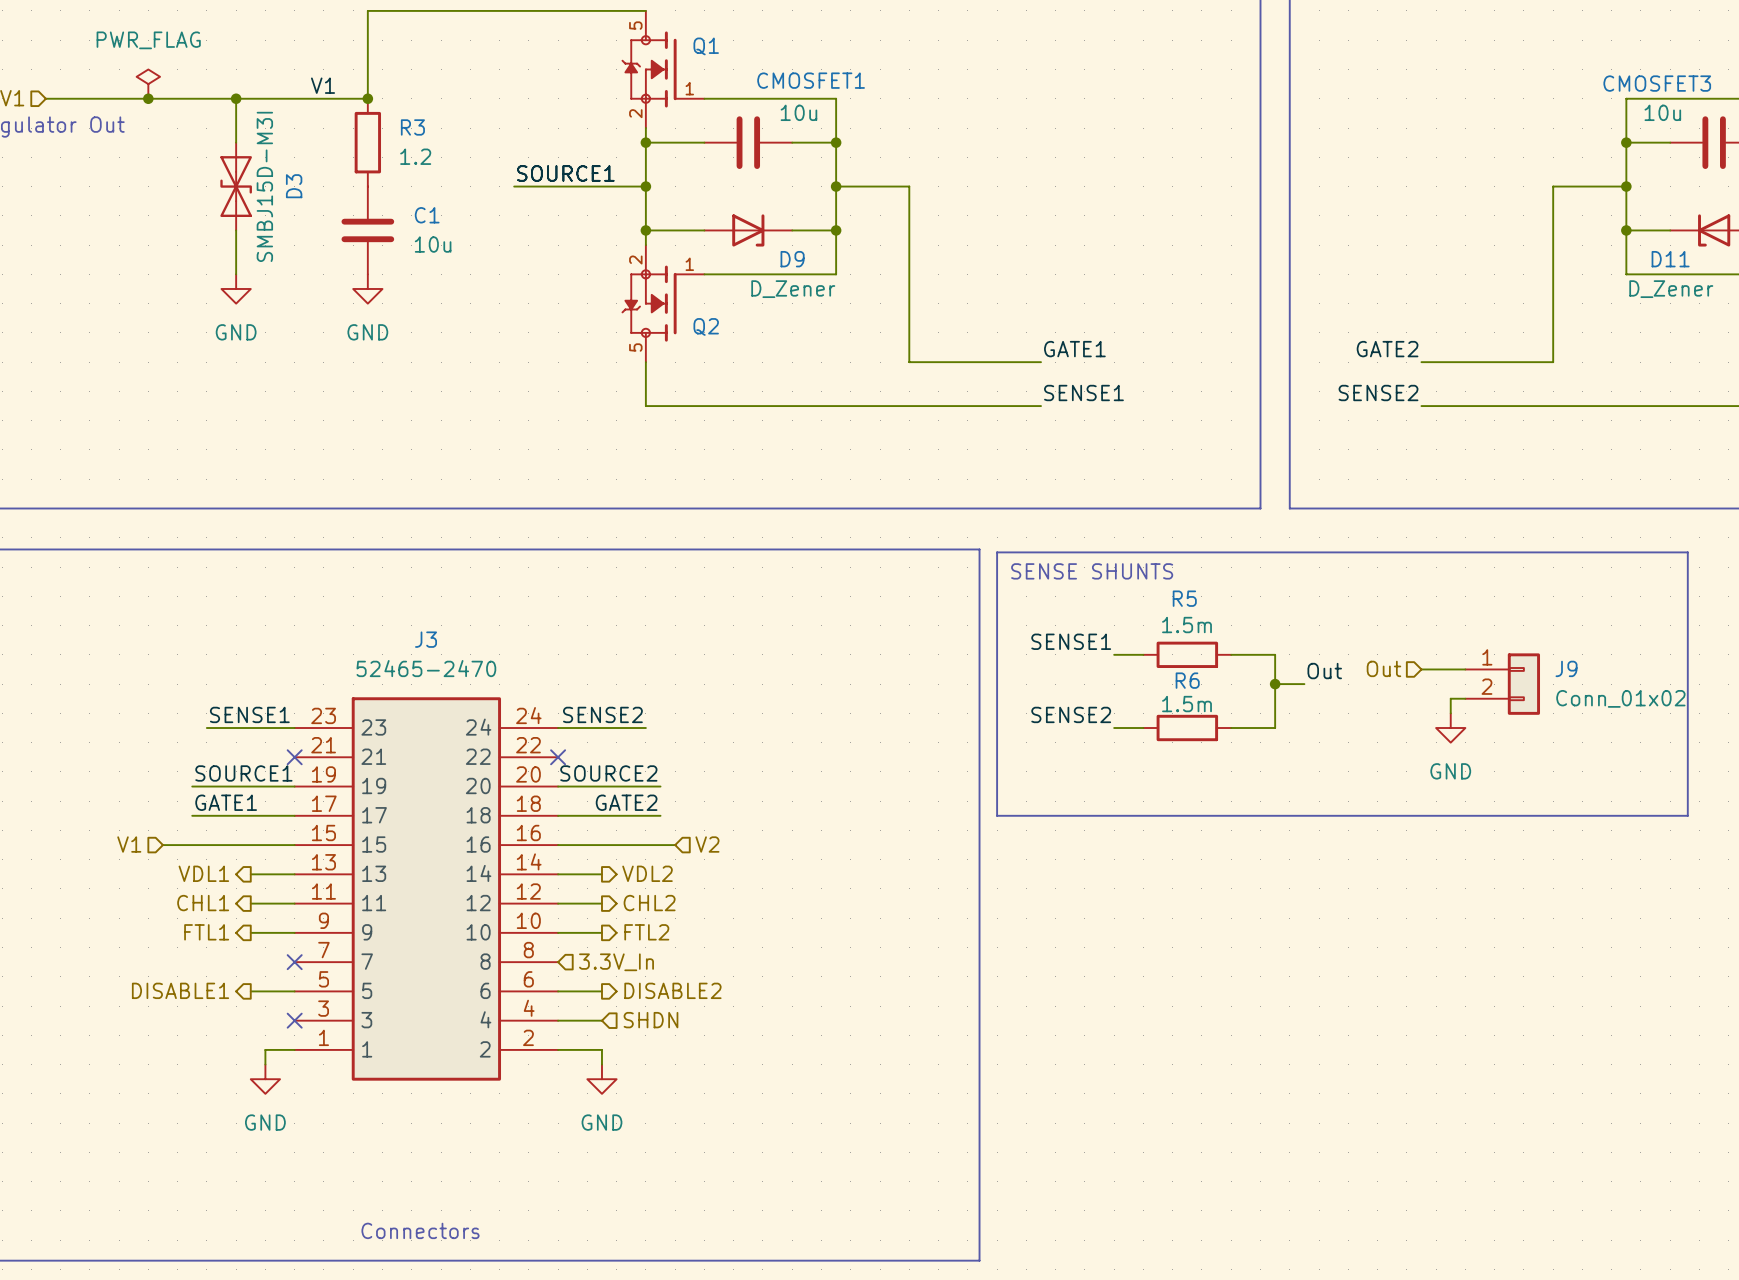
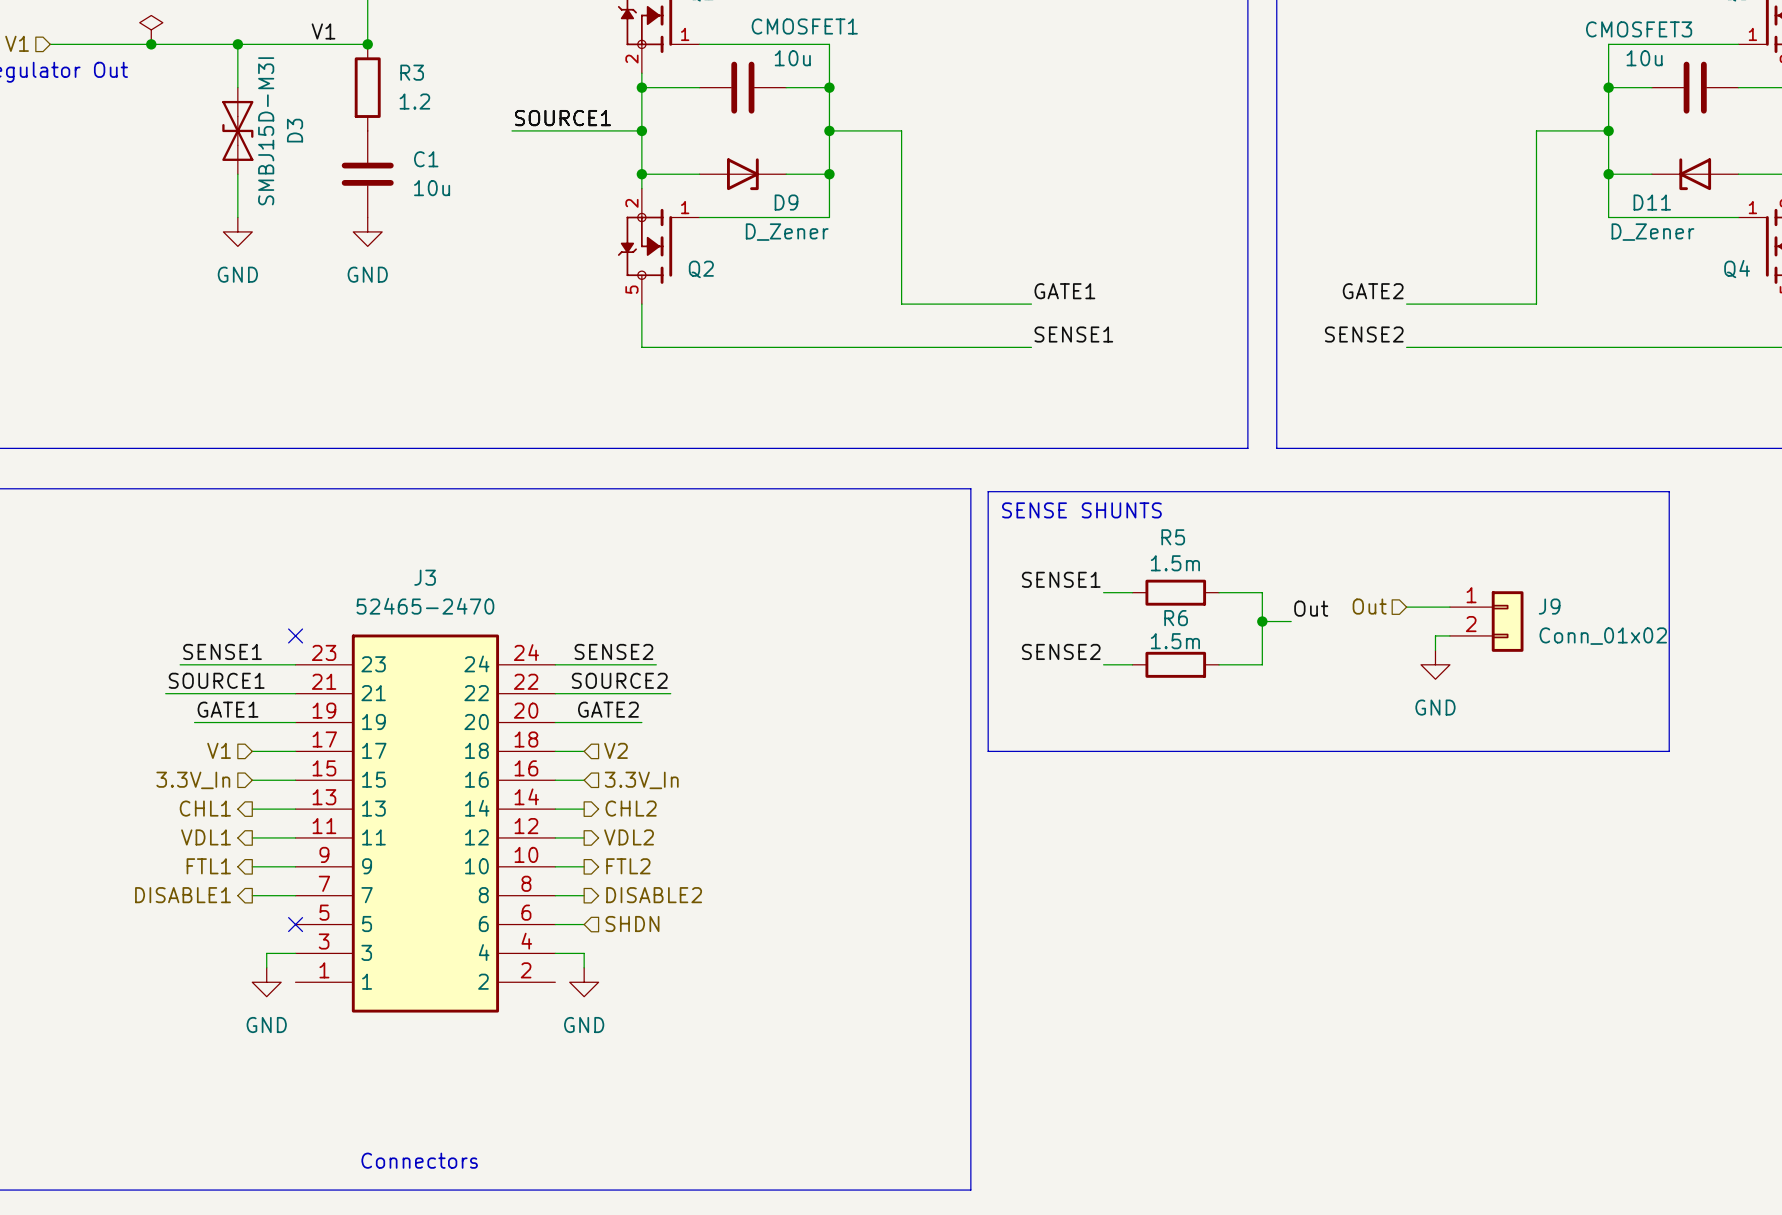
label position: SENSE1 (249, 714) -> SENSE1 (222, 651)
label position: SENSE2 (602, 714) -> SENSE2 (613, 651)
wire: none -> (180, 664) (208, 664)
label: none -> SOURCE1 (216, 680)
wire: none -> (165, 693) (295, 693)
no-connect mark position: (294, 757) -> (295, 635)
wire: none -> (555, 693) (670, 693)
no-connect mark: (558, 757) -> none
label: SOURCE1 (243, 773) -> GATE1 (228, 709)
label position: SOURCE2 (608, 773) -> SOURCE2 (619, 680)
wire: (645, 786) (660, 786) -> (641, 664) (656, 664)
label: GATE1 (226, 802) -> none
label position: GATE2 (626, 802) -> GATE2 (608, 709)
wire: (192, 815) (250, 815) -> none
wire: (587, 815) (660, 815) -> none
hierarchical label position: V1 (129, 844) -> V1 (219, 750)
hierarchical label position: V2 (707, 844) -> V2 (615, 750)
wire: (162, 845) (250, 845) -> none
hierarchical label: none -> 3.3V_In (193, 780)
wire: (587, 845) (675, 845) -> none
hierarchical label: VDL1 (203, 873) -> CHL1 (205, 808)
hierarchical label position: VDL2 (647, 873) -> VDL2 (629, 837)
wire: (587, 874) (601, 874) -> none
hierarchical label: CHL1 (203, 903) -> VDL1 (206, 837)
wire: (587, 903) (601, 903) -> none
hierarchical label position: CHL2 (649, 903) -> CHL2 (631, 808)
wire: (587, 932) (601, 932) -> none
hierarchical label position: FTL2 (646, 932) -> FTL2 (628, 866)
no-connect mark: (294, 962) -> none
wire: none -> (555, 895) (584, 895)
hierarchical label position: 3.3V_In (616, 962) -> 3.3V_In (641, 780)
hierarchical label position: DISABLE1 (180, 990) -> DISABLE1 (183, 895)
hierarchical label position: DISABLE2 (672, 990) -> DISABLE2 (654, 895)
wire: (250, 991) (294, 991) -> (252, 895) (295, 895)
no-connect mark: none -> (295, 924)
wire: (587, 991) (601, 991) -> none
no-connect mark: (294, 1020) -> none
wire: (587, 1020) (601, 1020) -> (584, 953) (584, 967)
hierarchical label position: SHDN (650, 1020) -> SHDN (632, 924)
wire: (294, 1049) (265, 1049) (265, 1064) -> (295, 953) (266, 953) (266, 967)
wire: (558, 1049) (601, 1049) (601, 1064) -> none
power symbol position: GND (265, 1079) -> GND (266, 982)
power symbol position: GND (601, 1079) -> GND (584, 982)

